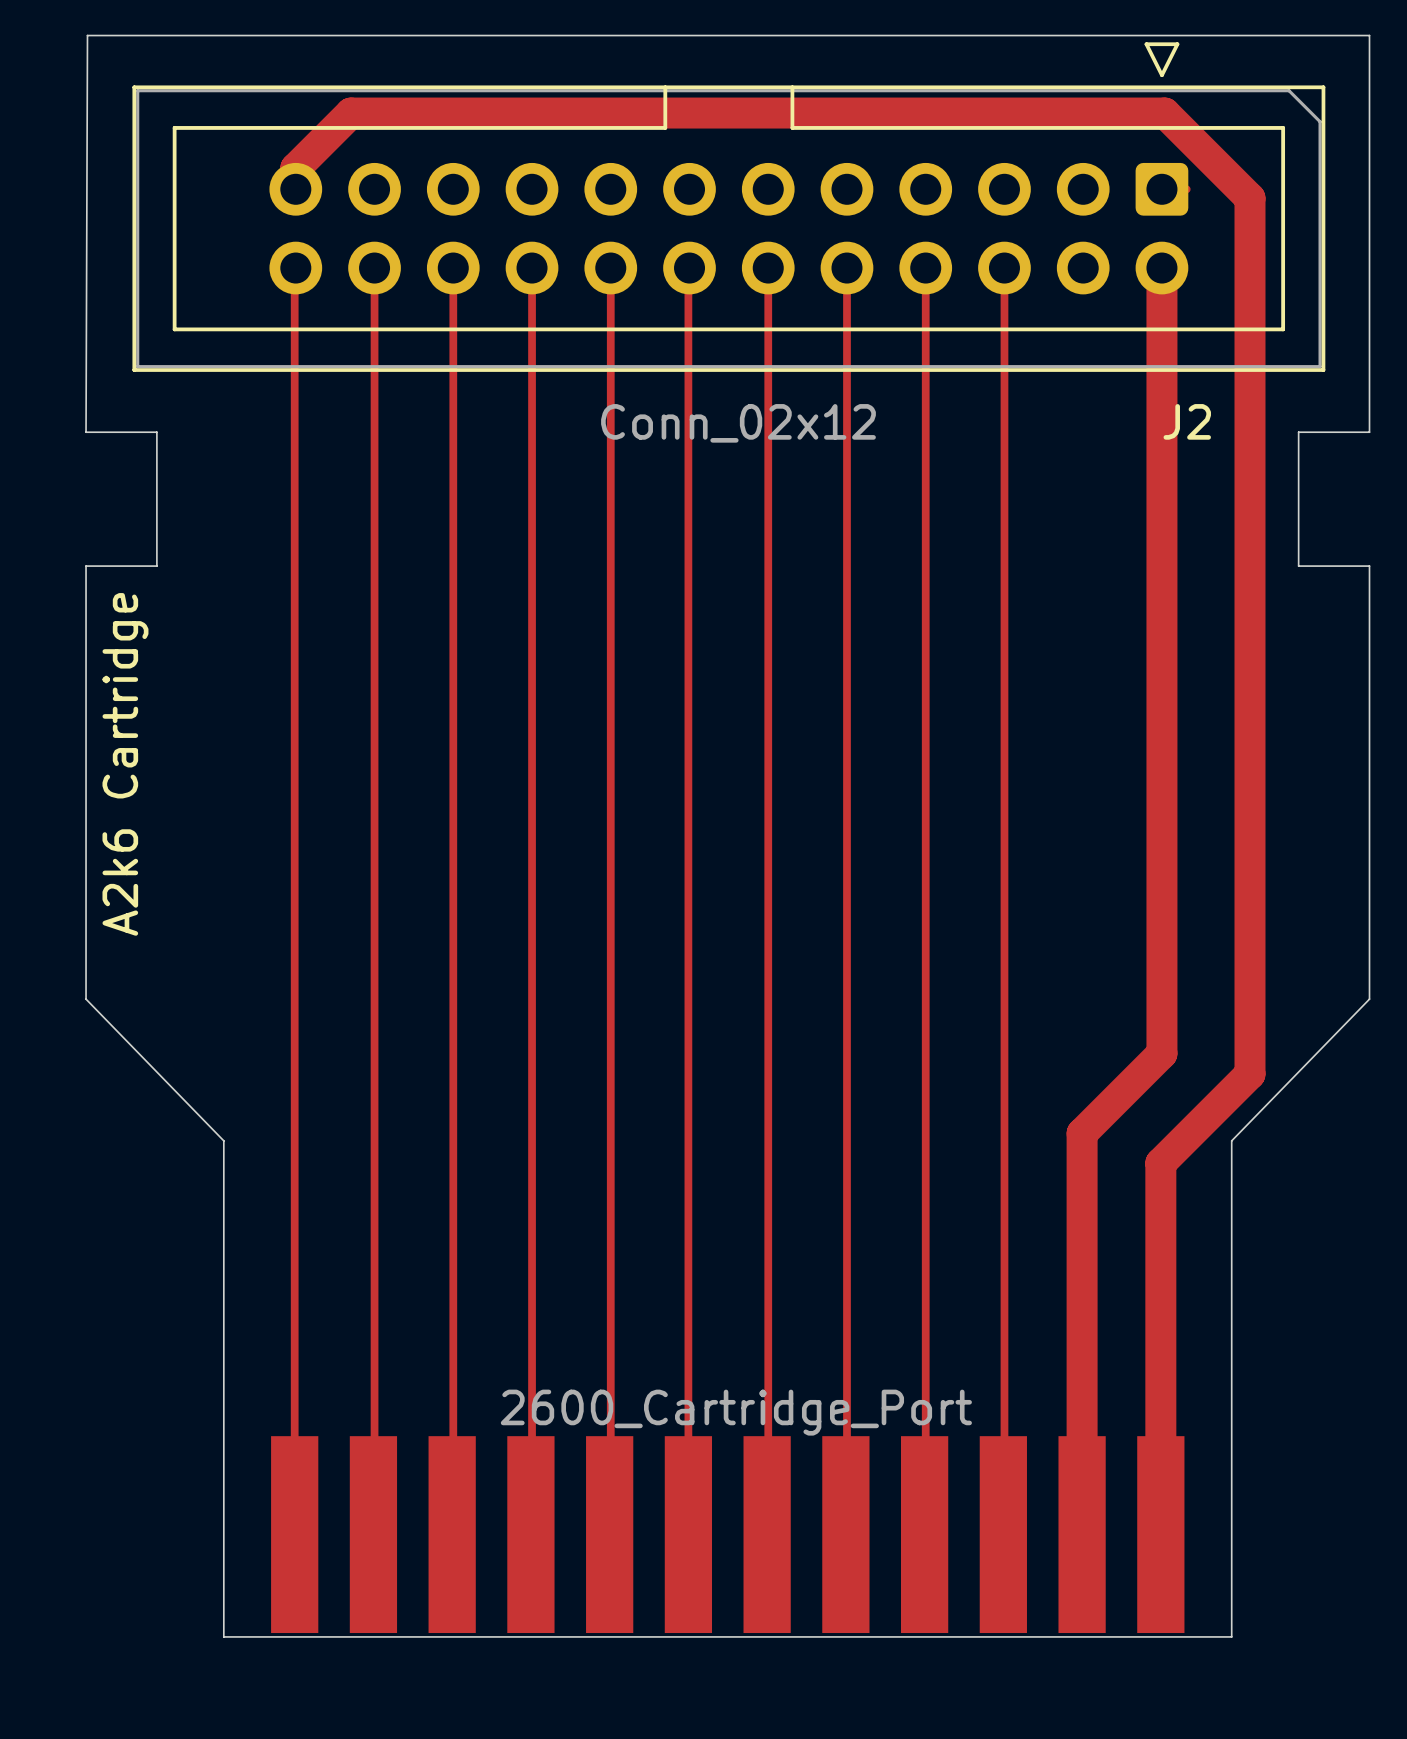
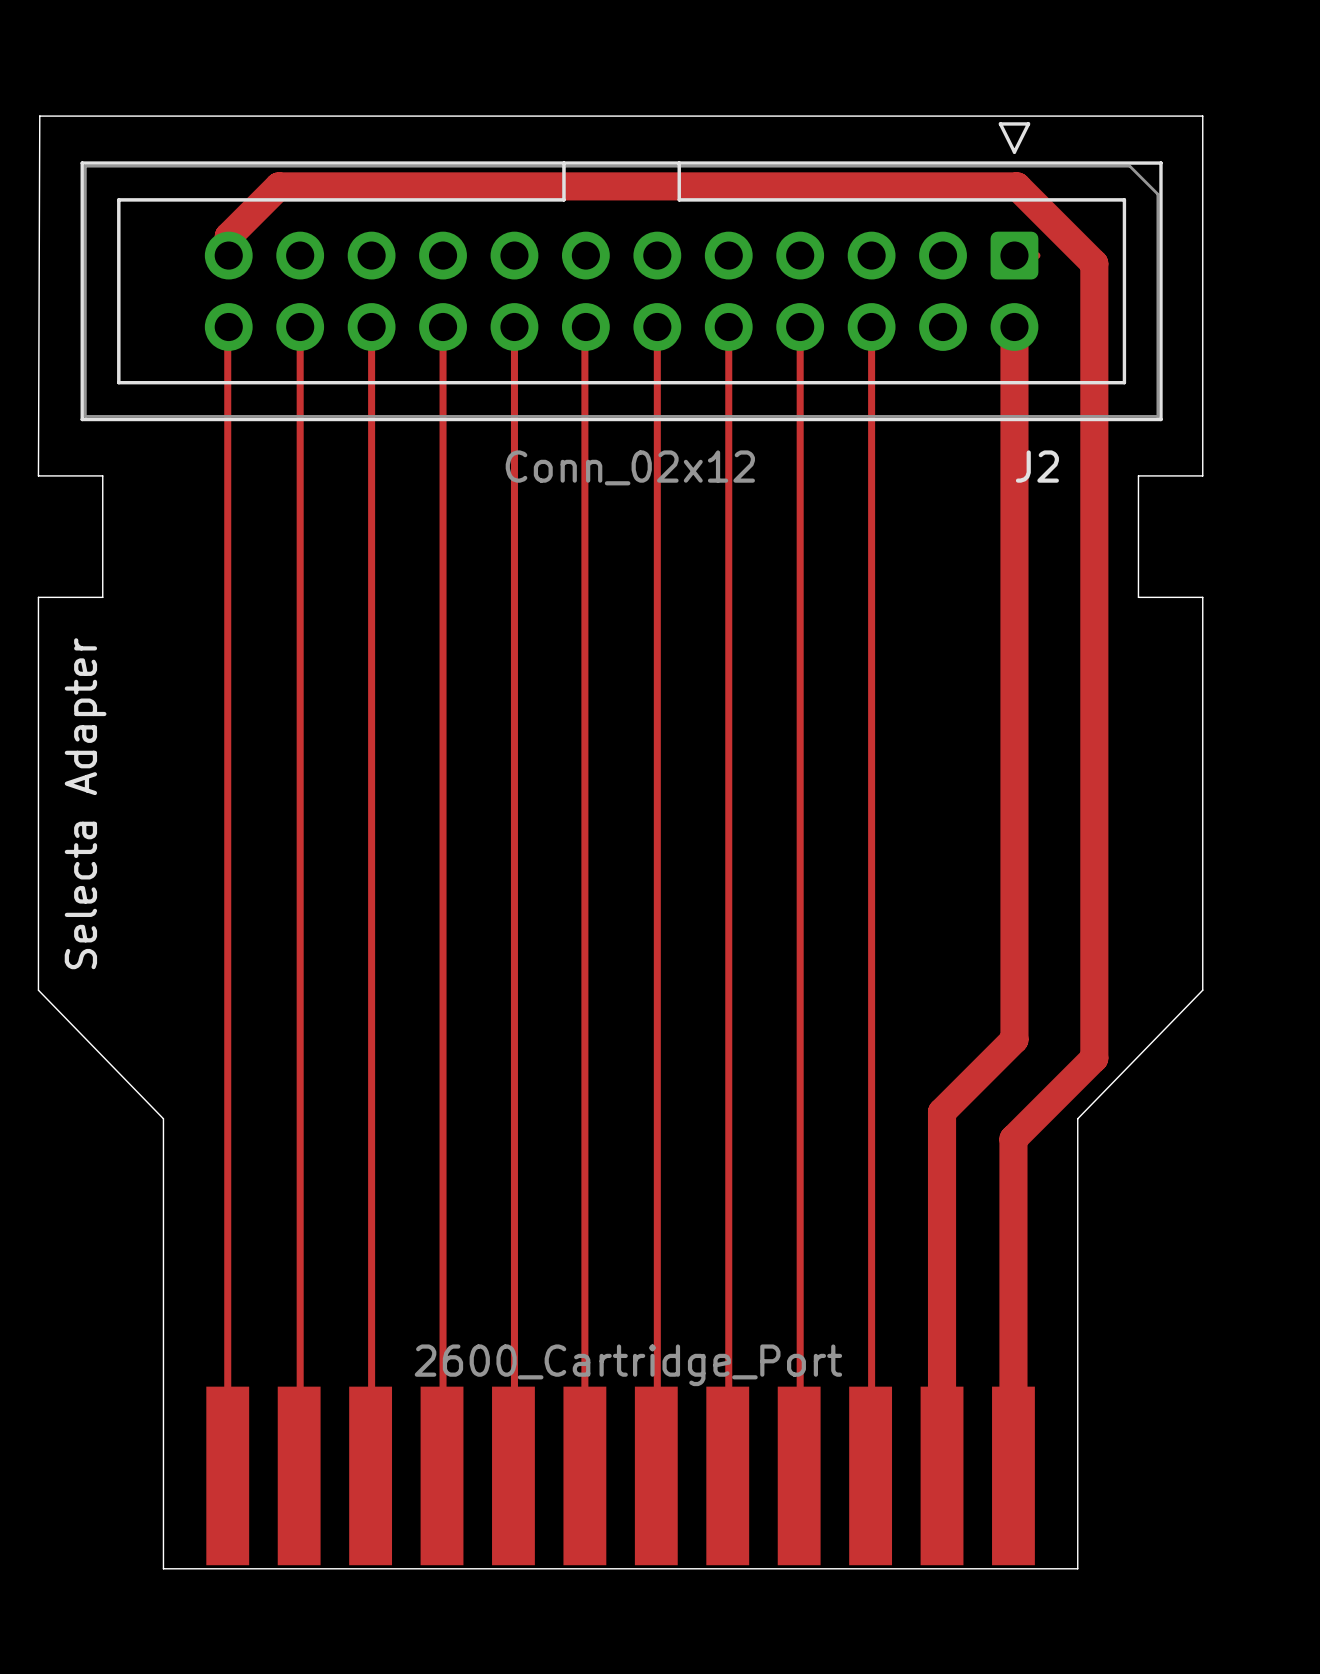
text: A2k6 Cartridge (125, 764) -> none
text: none -> Selecta Adapter (85, 803)

